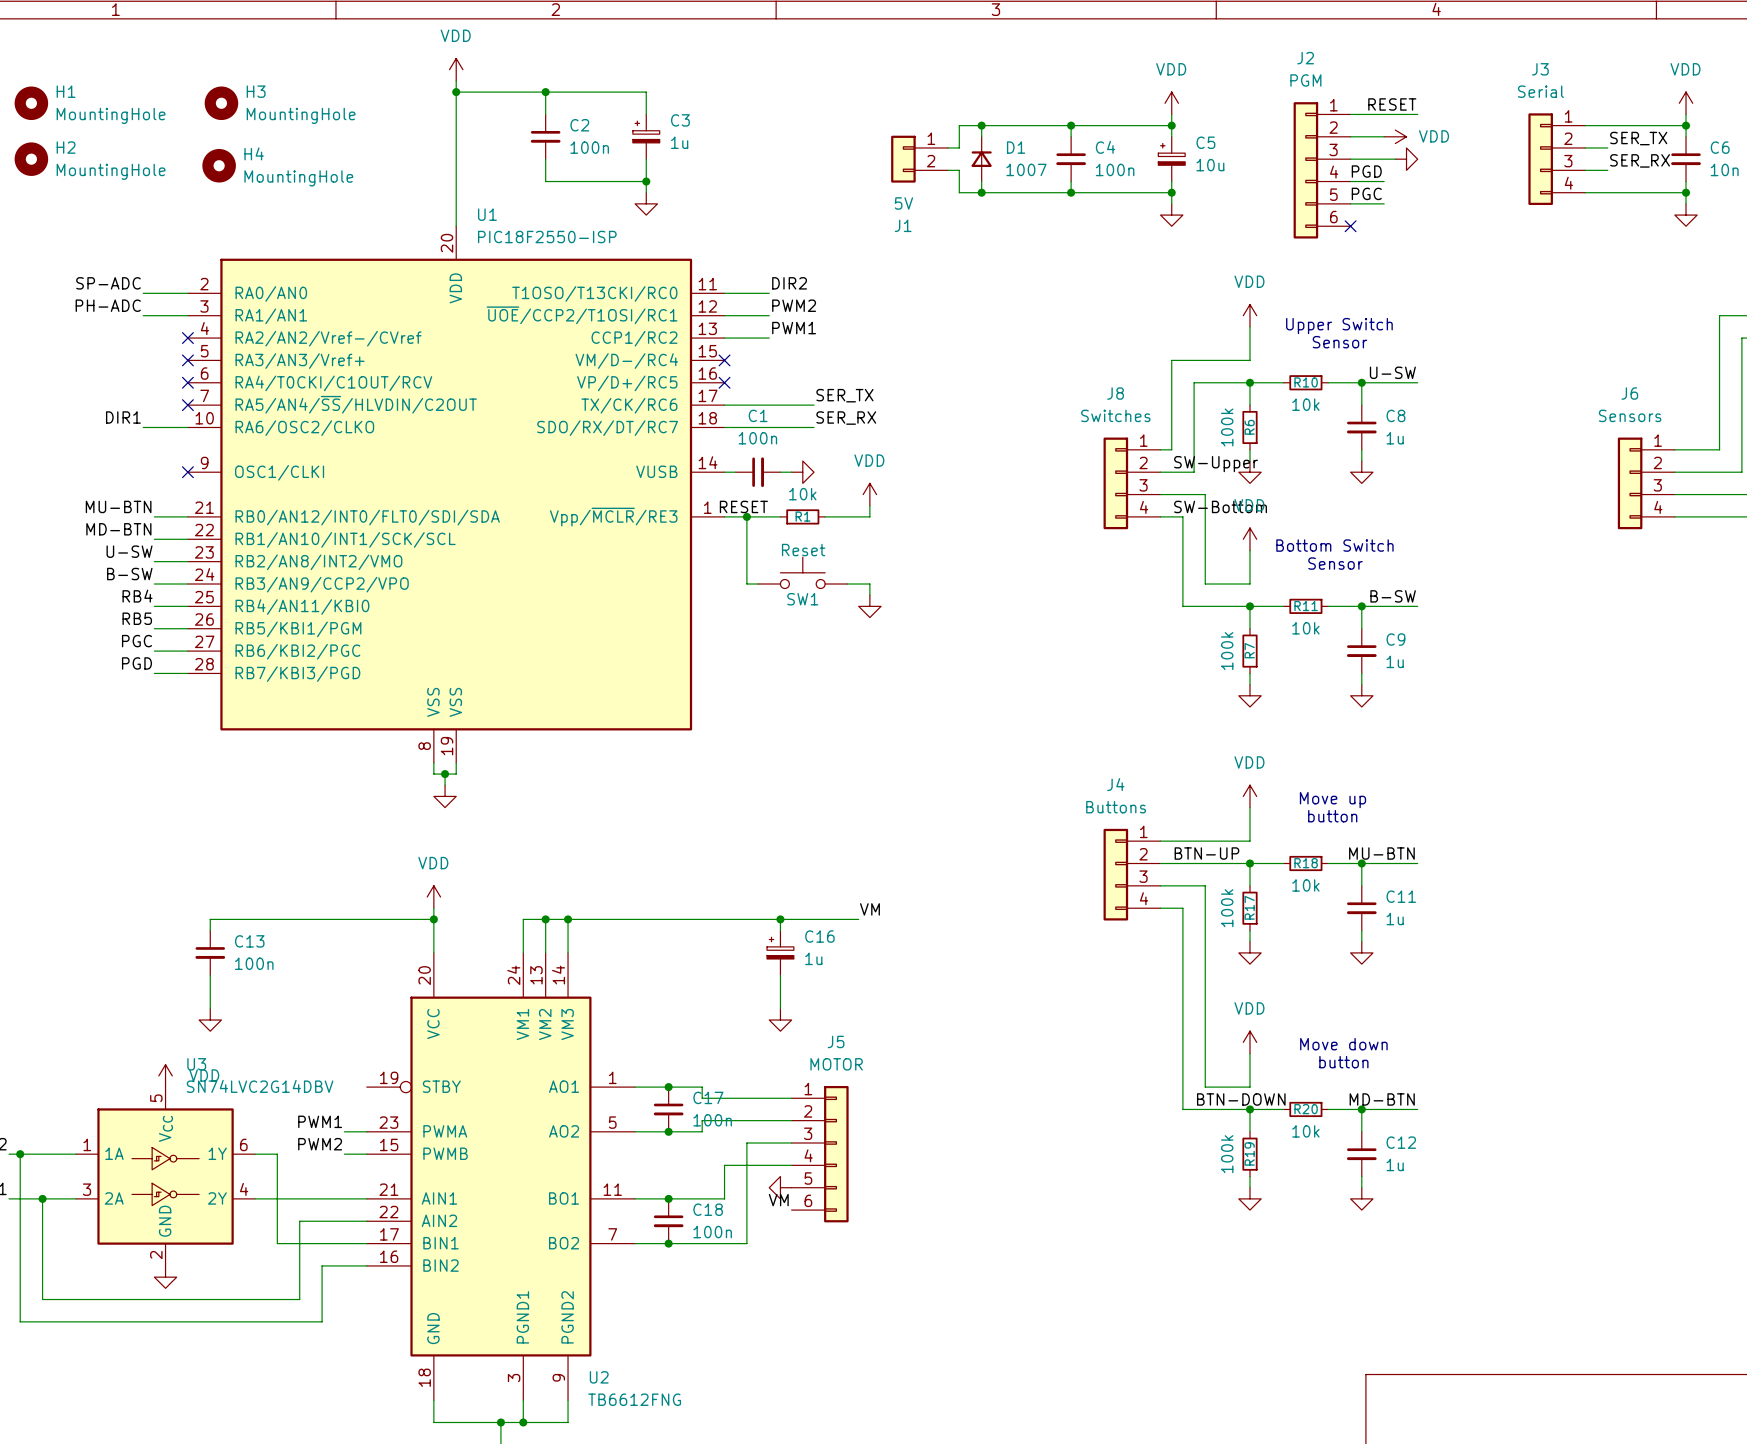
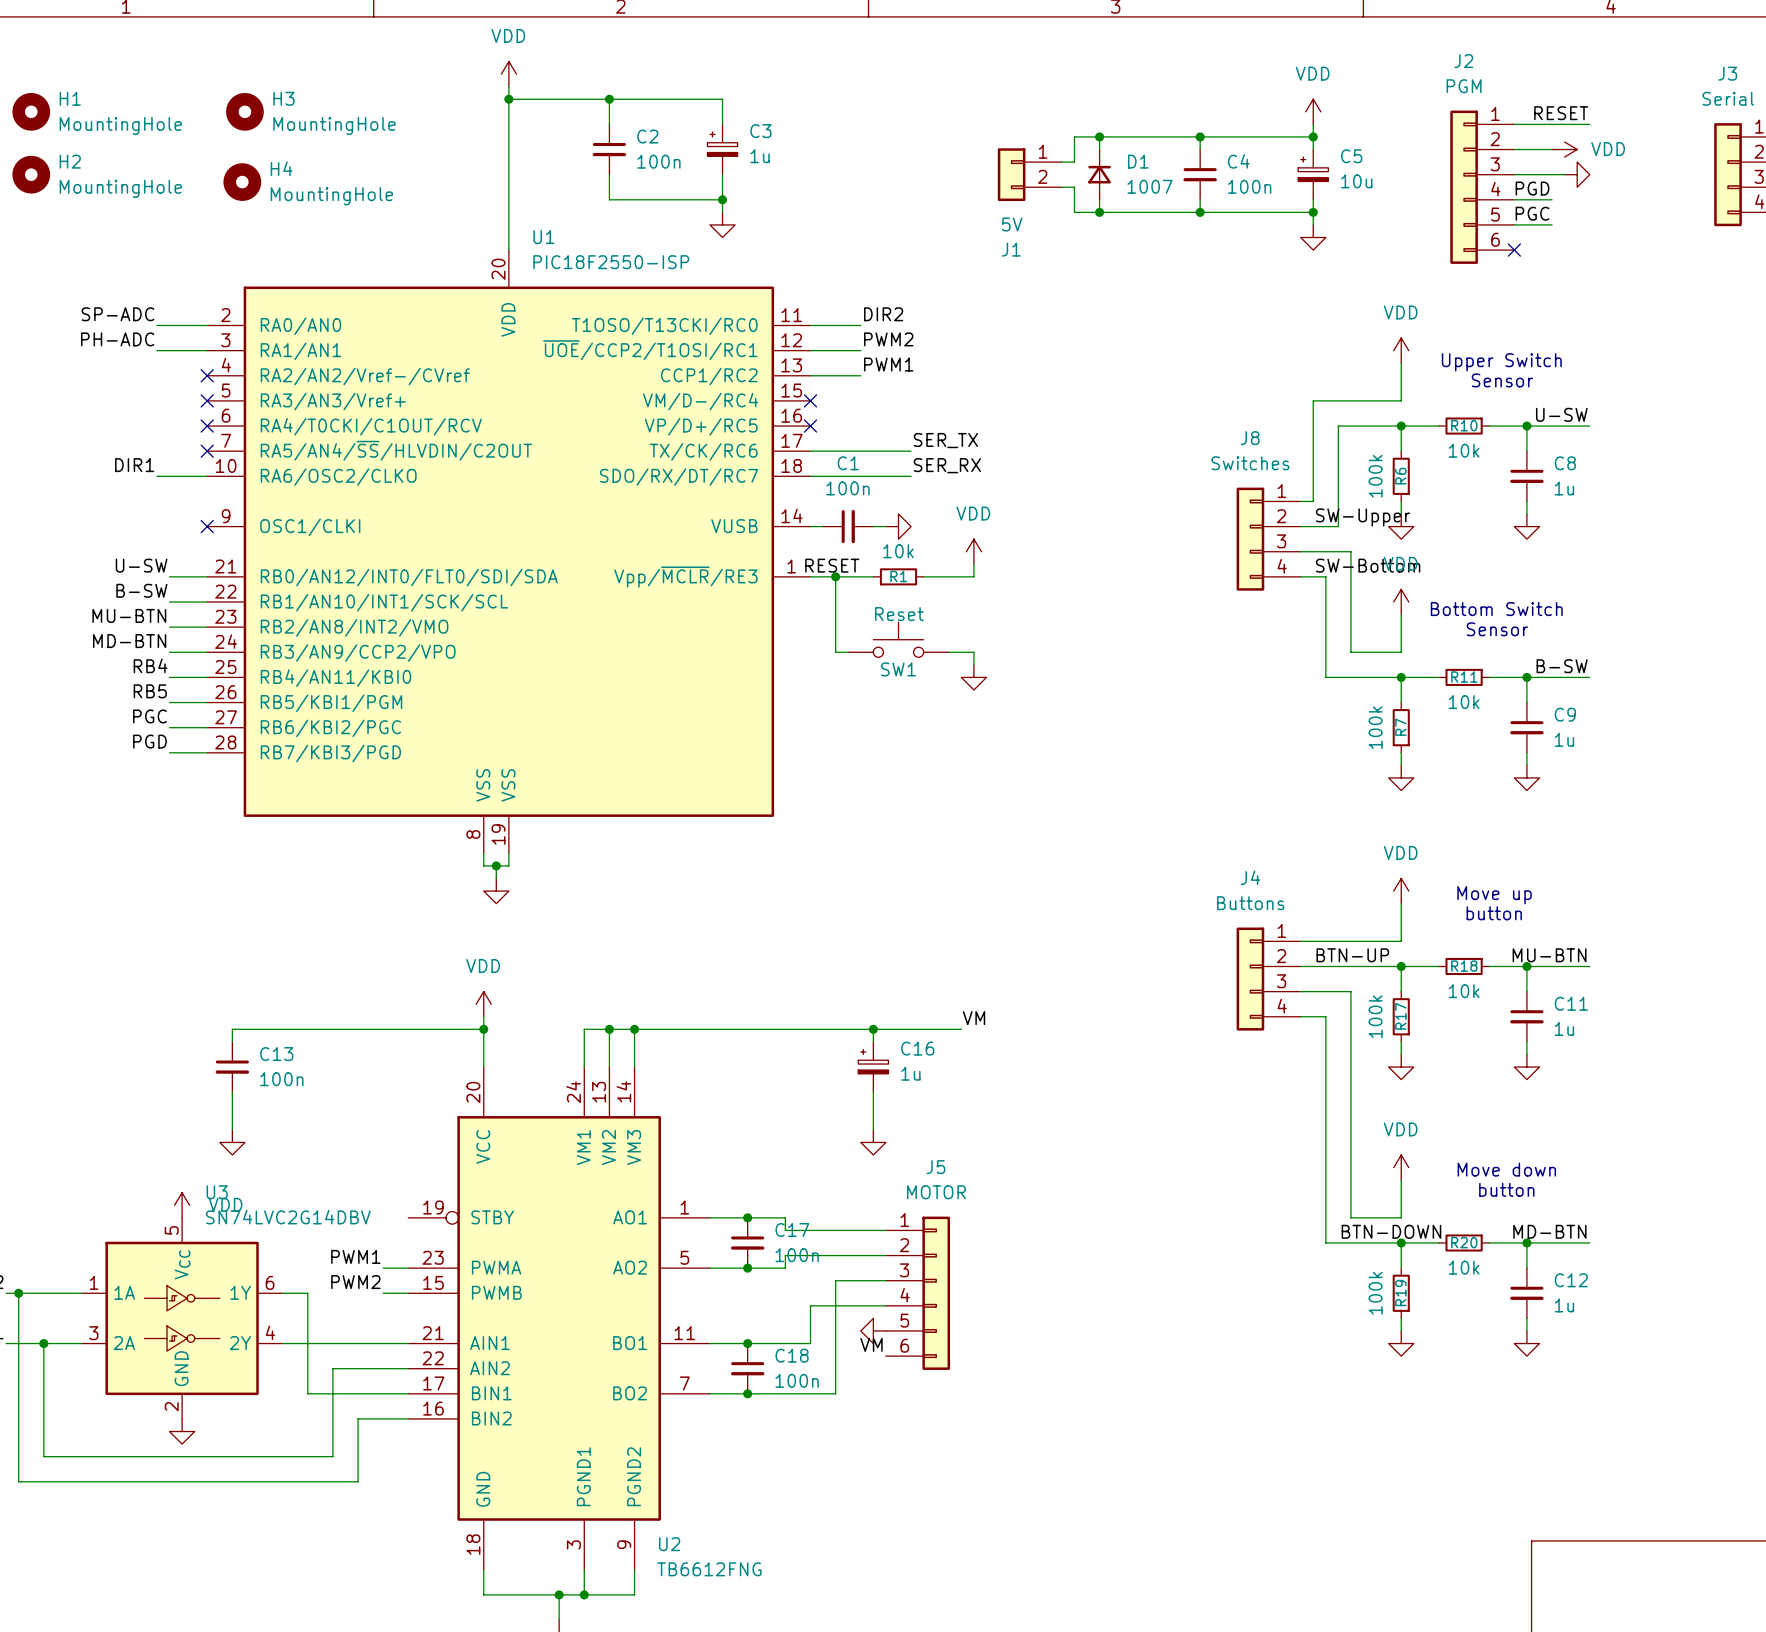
label: MU-BTN (118, 506) -> U-SW (141, 565)
label: MD-BTN (118, 529) -> B-SW (141, 590)
label: U-SW (129, 551) -> MU-BTN (129, 615)
label: B-SW (129, 574) -> MD-BTN (129, 641)

